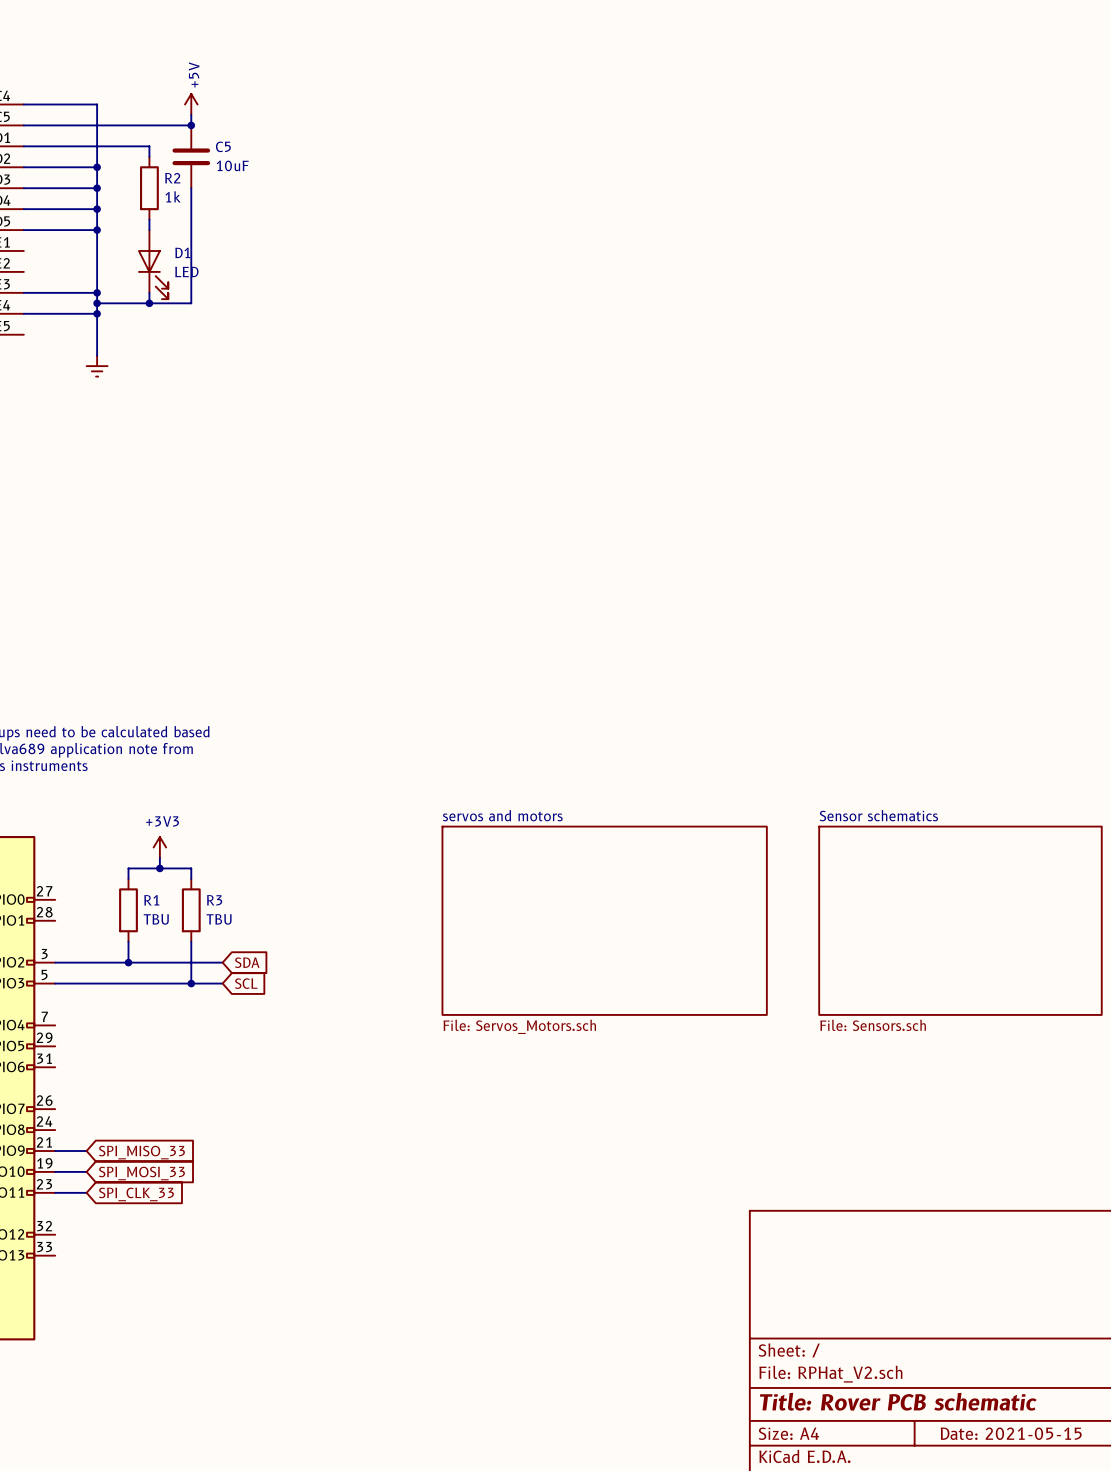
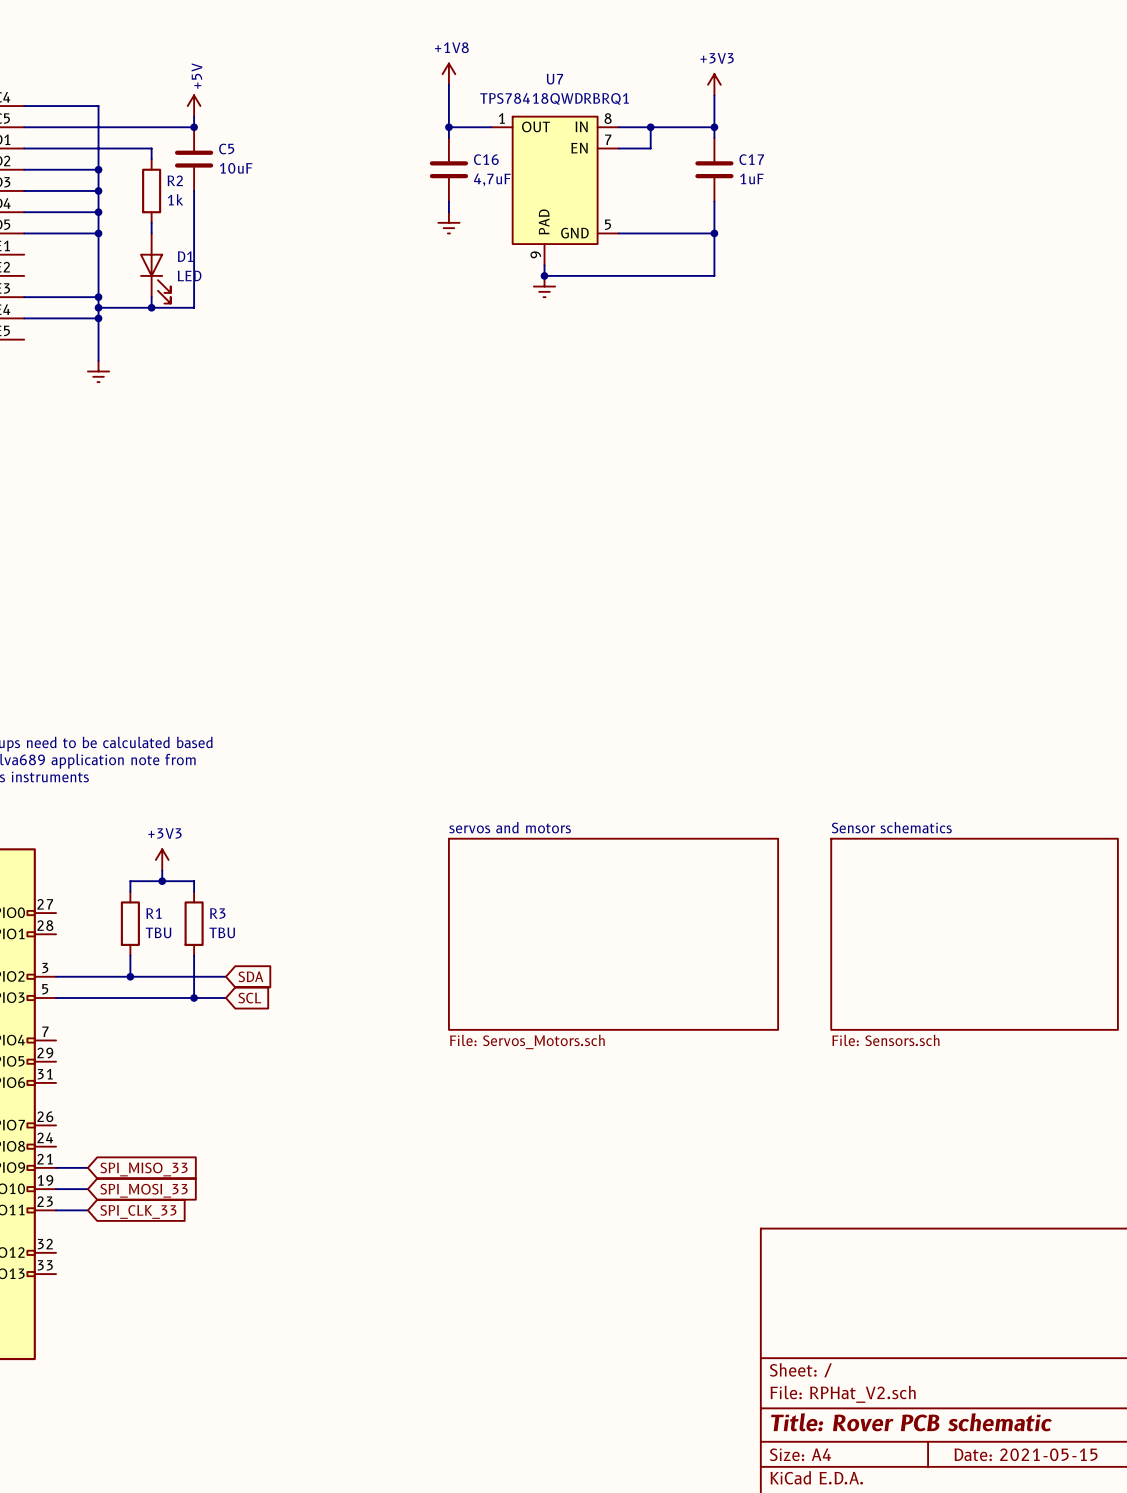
power symbol: none -> +1V8 (448, 74)
wire: none -> (448, 84) (448, 137)
power symbol: none -> +3V3 (714, 84)
wire: none -> (714, 95) (714, 137)
wire: none -> (448, 127) (491, 127)
junction: none -> (448, 127)
wire: none -> (618, 127) (714, 127)
wire: none -> (650, 127) (650, 148) (618, 148)
junction: none -> (650, 127)
junction: none -> (714, 127)
C16: none -> 4,7uF (448, 169)
C17: none -> 1uF (714, 169)
U7: none -> TPS78418QWDRBRQ1 (555, 190)
wire: none -> (448, 201) (448, 212)
wire: none -> (714, 201) (714, 275) (544, 275) (544, 265)
power symbol: none -> (448, 222)
wire: none -> (618, 233) (714, 233)
junction: none -> (714, 233)
junction: none -> (544, 275)
power symbol: none -> (544, 286)

